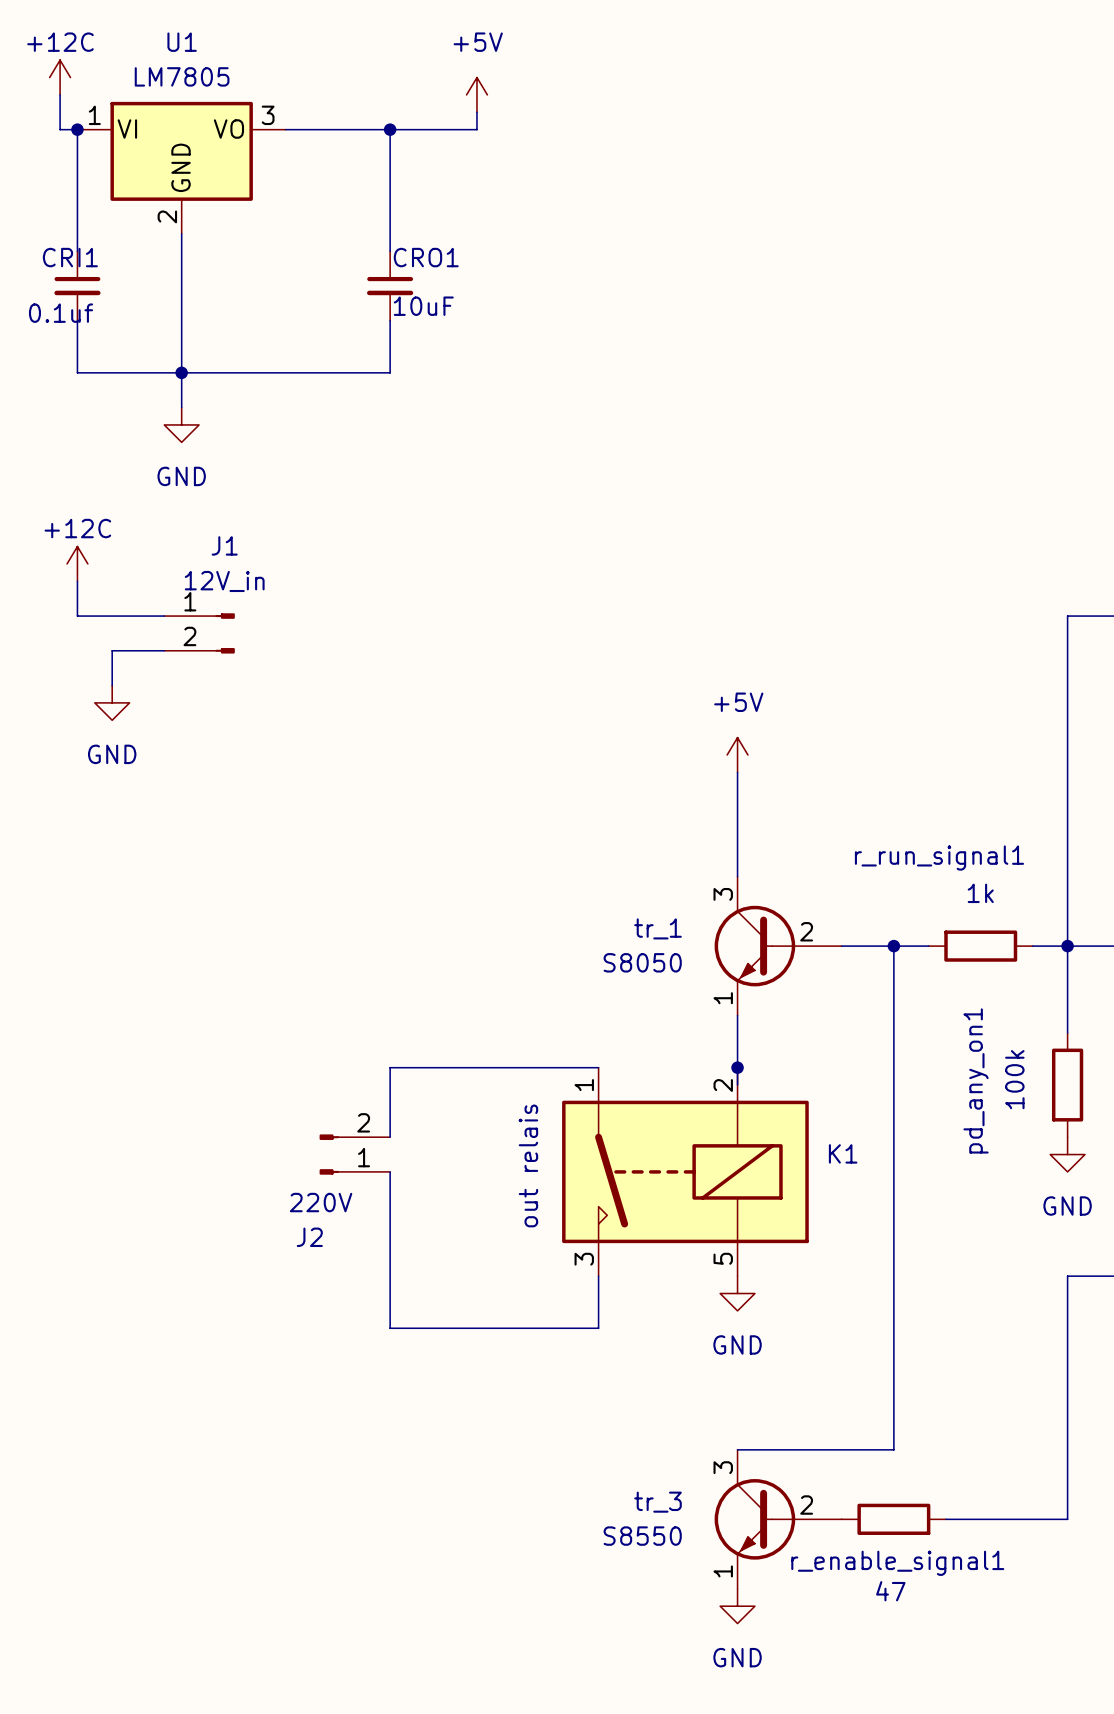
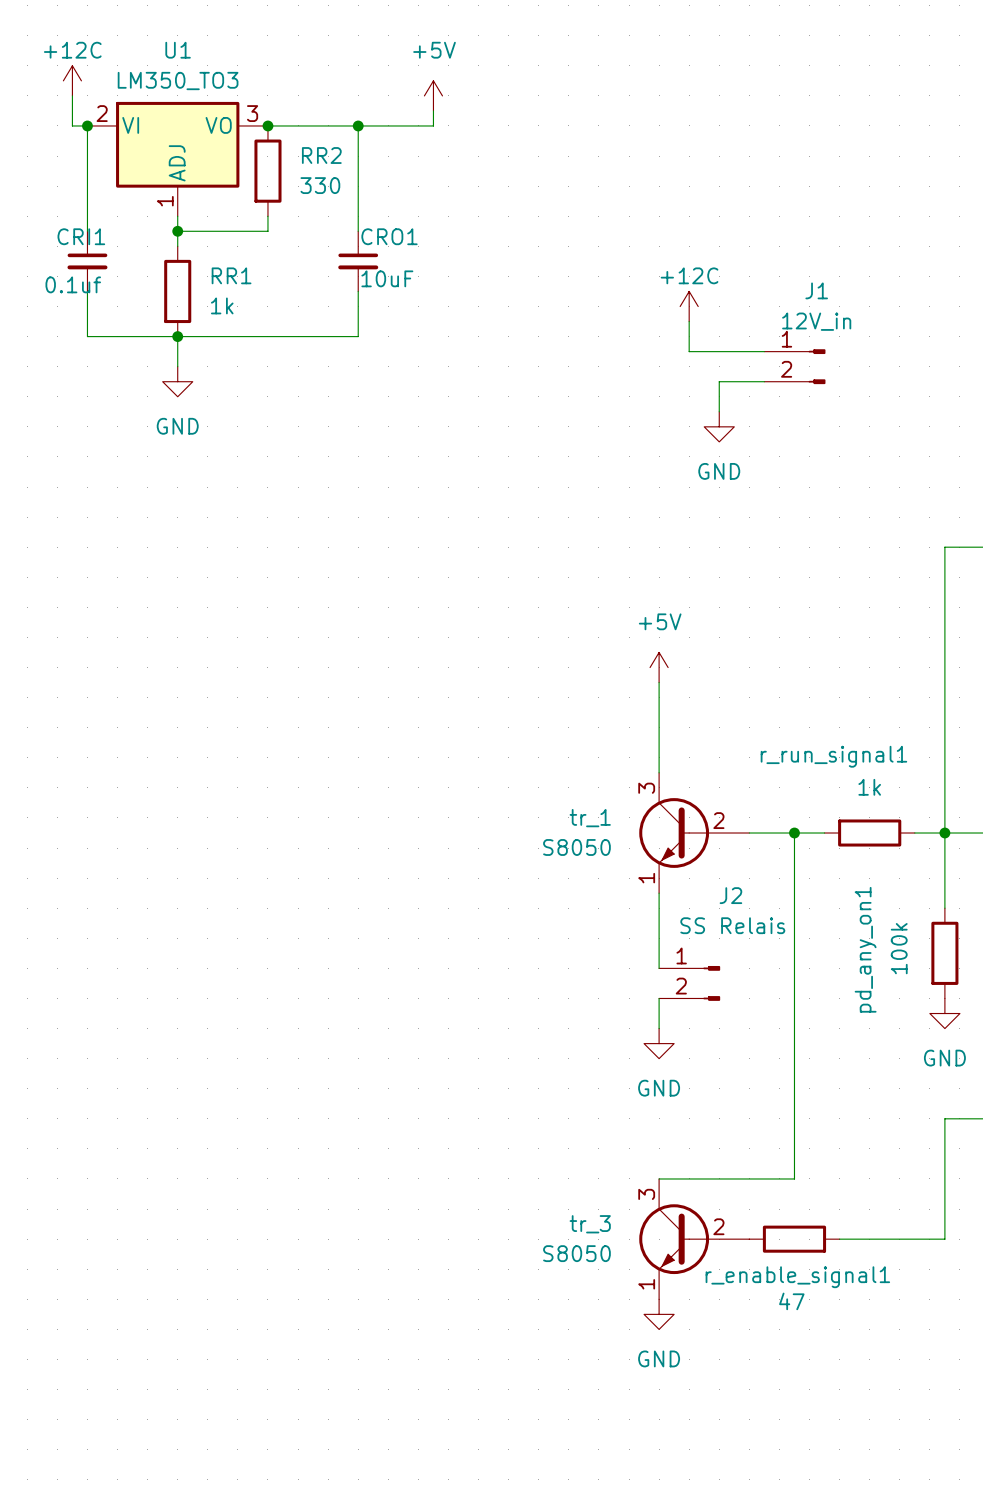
U1 value: LM7805 (182, 76) -> LM350_TO3 (178, 81)
U1 pin number: 1 (94, 115) -> 2 (102, 113)
junction: none -> (267, 125)
U1 pin name: GND (181, 167) -> ADJ (177, 163)
RR2: none -> 330 (267, 171)
U1 pin number: 2 (167, 216) -> 1 (165, 201)
wire: none -> (267, 216) (267, 231) (177, 231)
junction: none -> (177, 231)
wire: (181, 268) (181, 372) -> none
RR1: none -> 1k (177, 291)
power symbol: none -> +12C (689, 306)
wire: none -> (689, 321) (689, 351) (764, 351)
wire: none -> (764, 381) (719, 381) (719, 411)
power symbol: none -> GND (719, 426)
power symbol: +12C (77, 563) -> none
wire: (77, 581) (77, 616) (164, 616) -> none
J1 position: (199, 633) -> (794, 366)
wire: (164, 650) (112, 650) (112, 685) -> none
power symbol: GND (112, 702) -> none
wire: (598, 1067) (390, 1067) (390, 1137) -> none
junction: (737, 1067) -> none
J2 rotation: 0° (329, 1154) -> 180° (711, 983)
J2 position: (354, 1154) -> (689, 983)
wire: (390, 1171) (390, 1328) (598, 1328) (598, 1276) -> none
K1: out relais (685, 1171) -> none
power symbol: none -> GND (659, 1043)
J2 value: 220V (321, 1202) -> SS Relais (732, 925)
power symbol: GND (737, 1293) -> none
wire: (893, 1345) (893, 1449) (737, 1449) -> (794, 1178) (659, 1178)
wire: (1067, 1415) (1067, 1519) (946, 1519) -> (944, 1239) (839, 1239)
power symbol: none -> GND (659, 1314)
tr_3 position: (778, 1519) -> (694, 1239)
r_enable_signal1 position: (893, 1519) -> (794, 1239)
tr_3 value: S8550 (642, 1536) -> S8050 (576, 1253)
power symbol: GND (737, 1606) -> none

